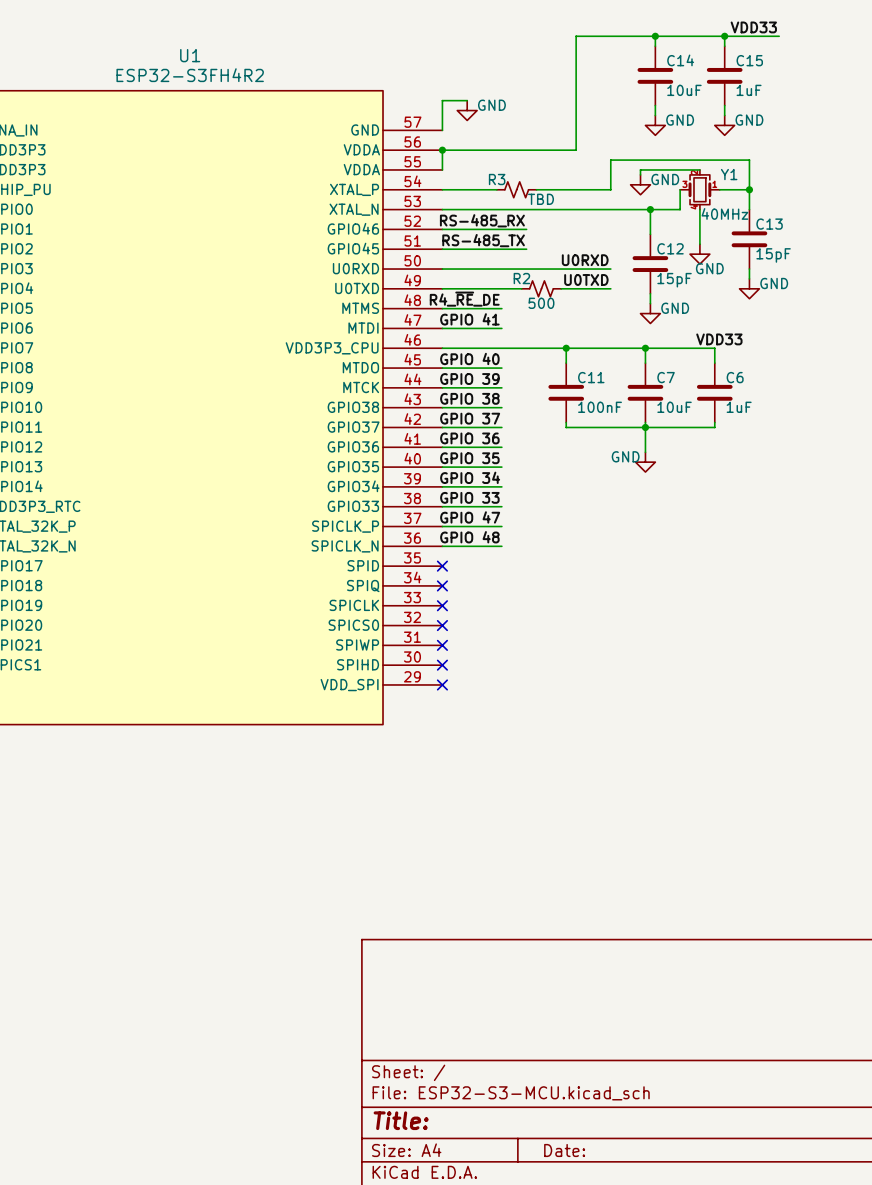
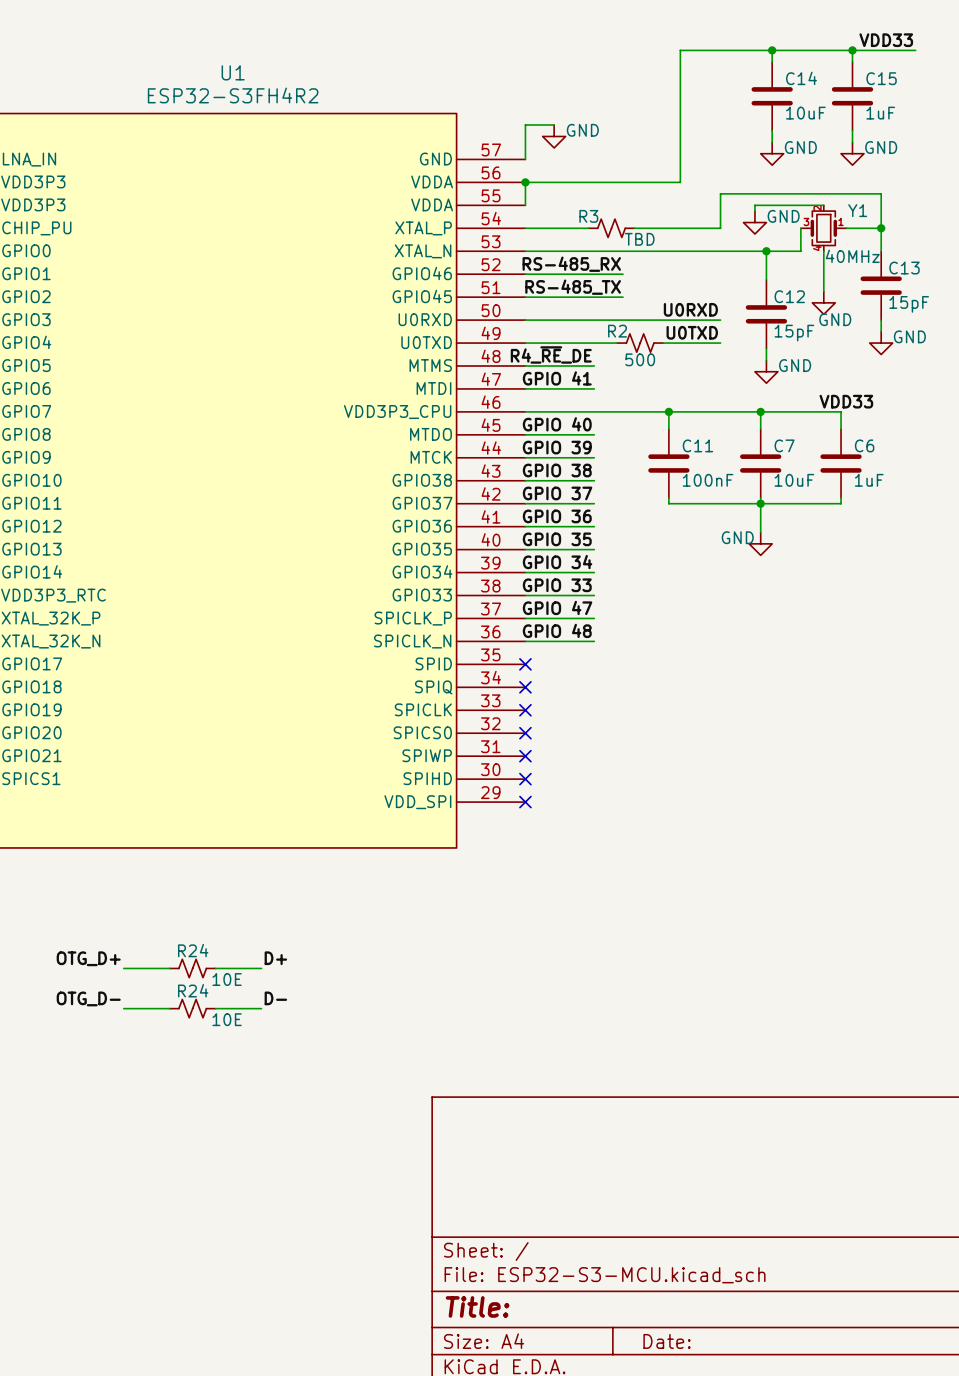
label: none -> D+ (275, 958)
label: none -> OTG_D+ (88, 958)
wire: none -> (123, 968) (169, 968)
R24: none -> 10E (192, 968)
wire: none -> (215, 968) (261, 968)
label: none -> OTG_D- (88, 998)
label: none -> D- (275, 998)
wire: none -> (123, 1008) (169, 1008)
R24: none -> 10E (192, 1008)
wire: none -> (215, 1008) (261, 1008)

